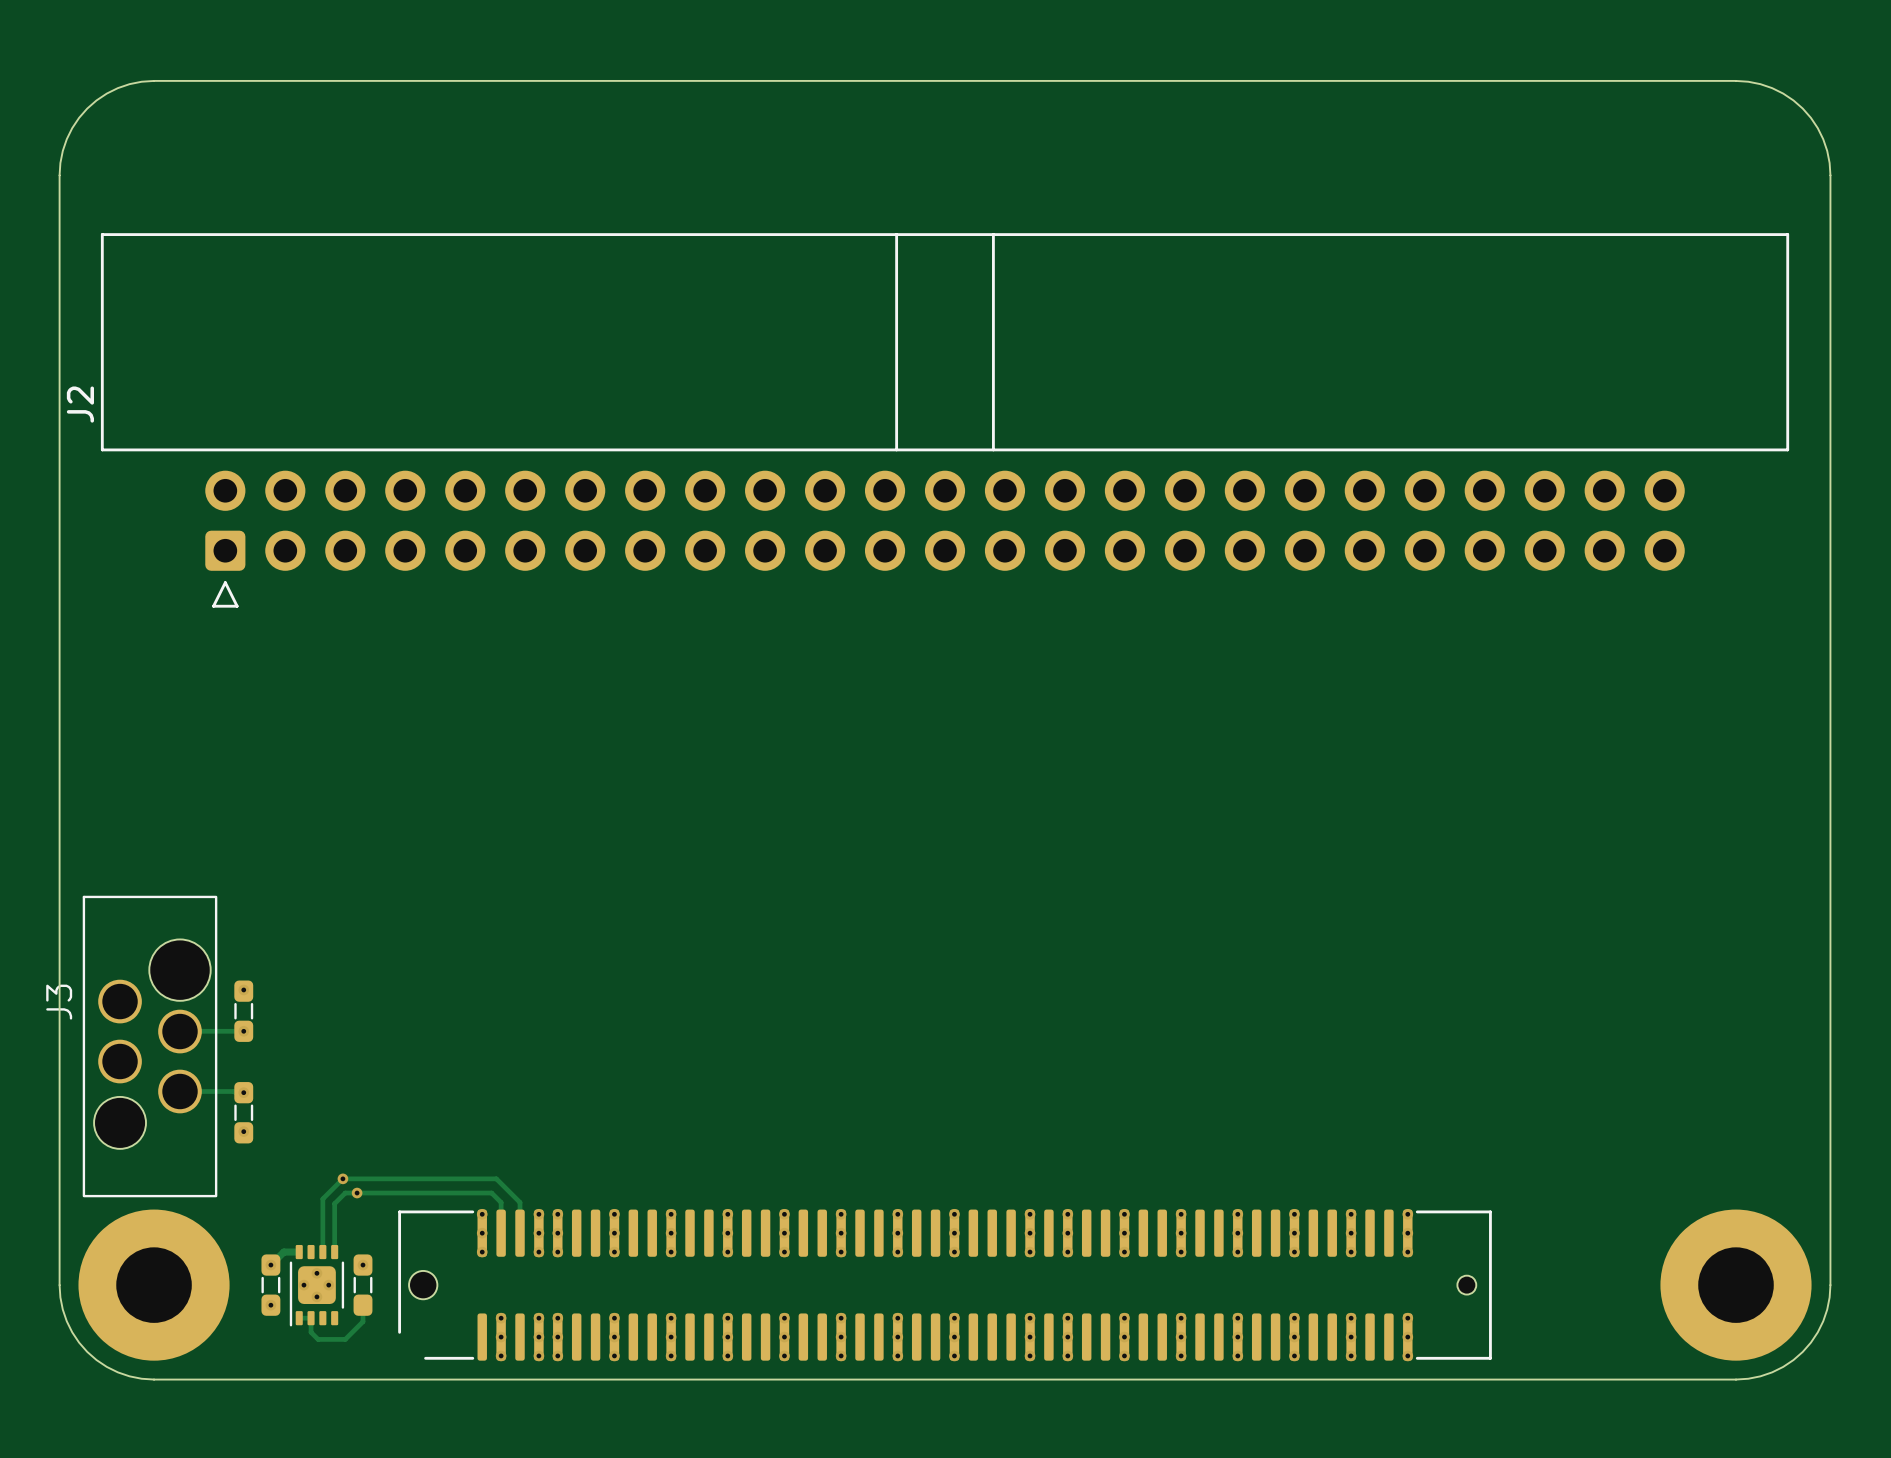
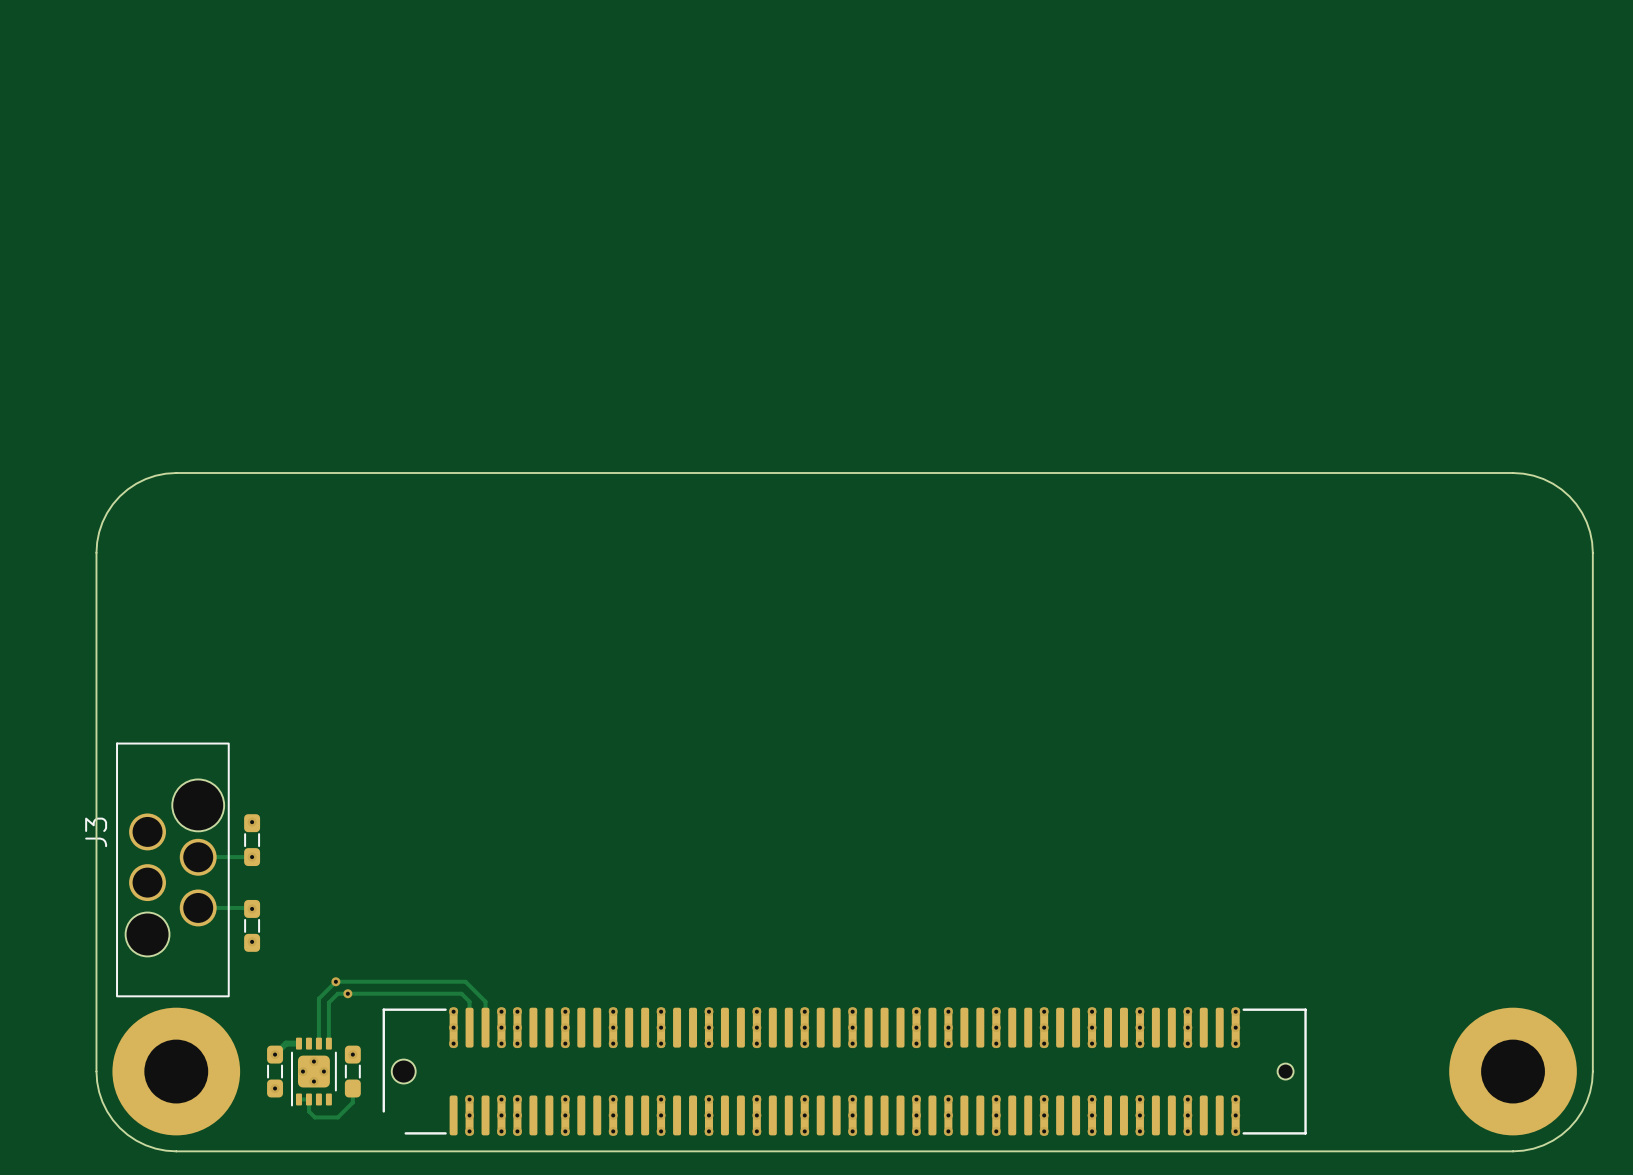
J2: (945, 420) -> none
board edge: (59, 671) (60, 163) (66, 139) (72, 128) (87, 108) (96, 100) (117, 88) (129, 84) (154, 80) (1736, 80) (1760, 84) (1772, 88) (1793, 100) (1810, 117) (1823, 139) (1829, 163) (1830, 671) -> (96, 552) (102, 522) (119, 496) (145, 479) (176, 473) (1513, 473) (1543, 479) (1569, 496) (1586, 522) (1592, 552)

